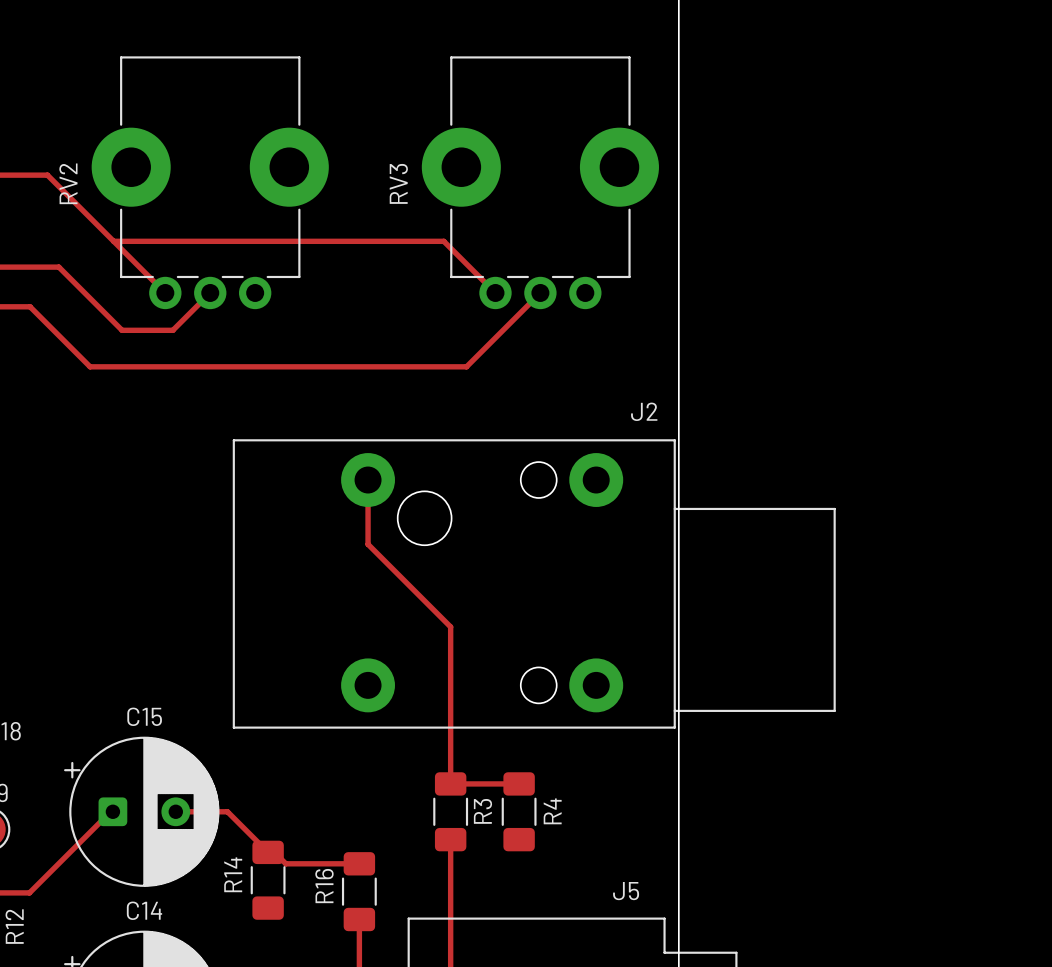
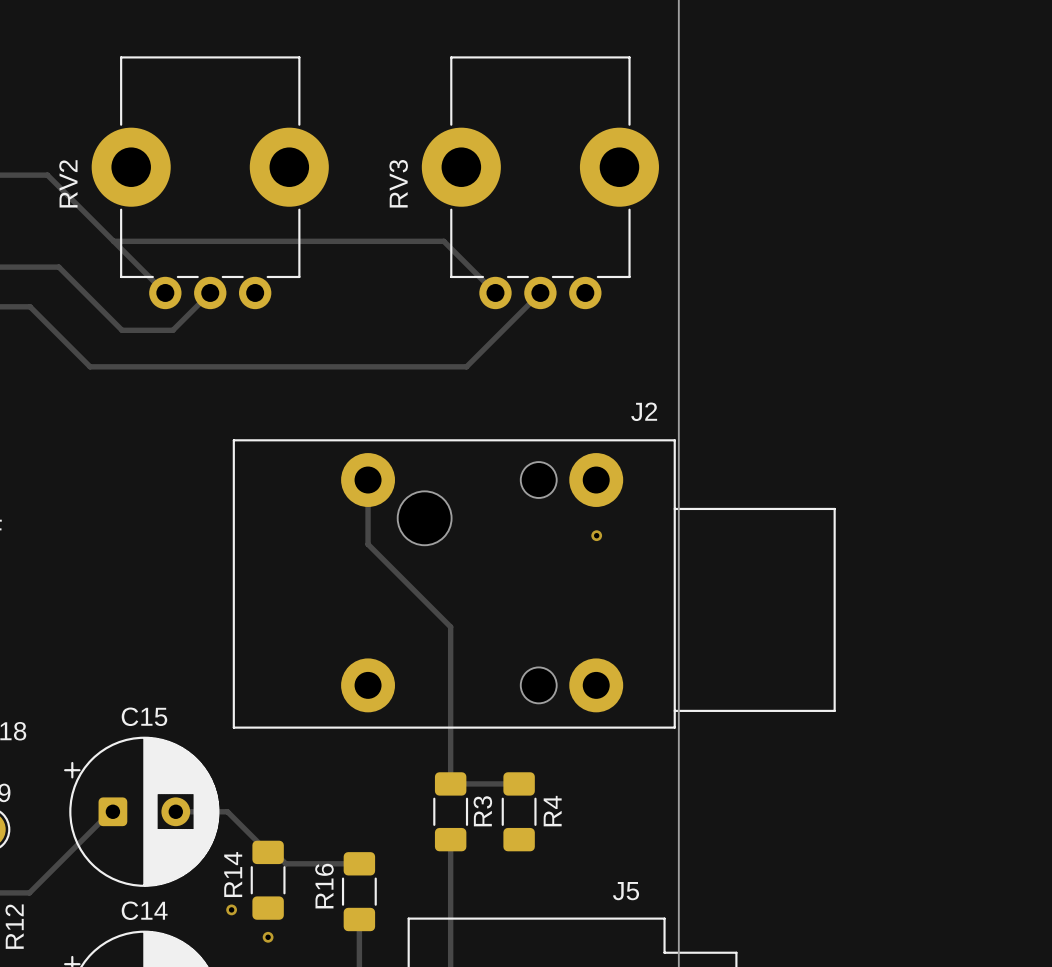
via: none -> (596, 535)
via: none -> (231, 909)
via: none -> (268, 937)

